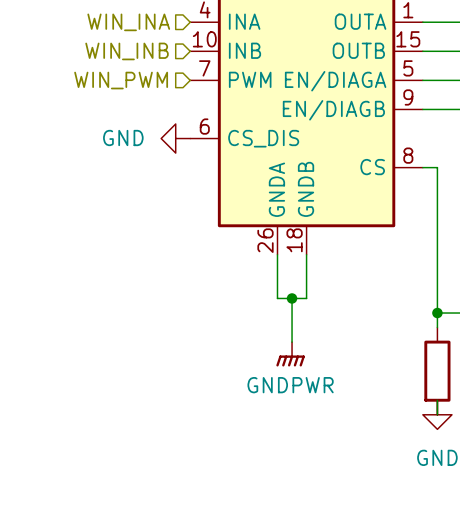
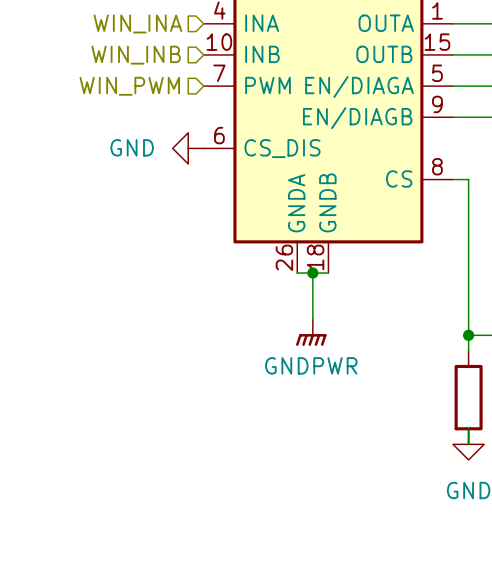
wire: (277, 254) (277, 298) (306, 298) (306, 254) -> (297, 273) (328, 273)
wire: (292, 298) (292, 342) -> (312, 319) (312, 273)
junction position: (292, 298) -> (312, 273)
power symbol position: GNDPWR (290, 354) -> GNDPWR (311, 332)

